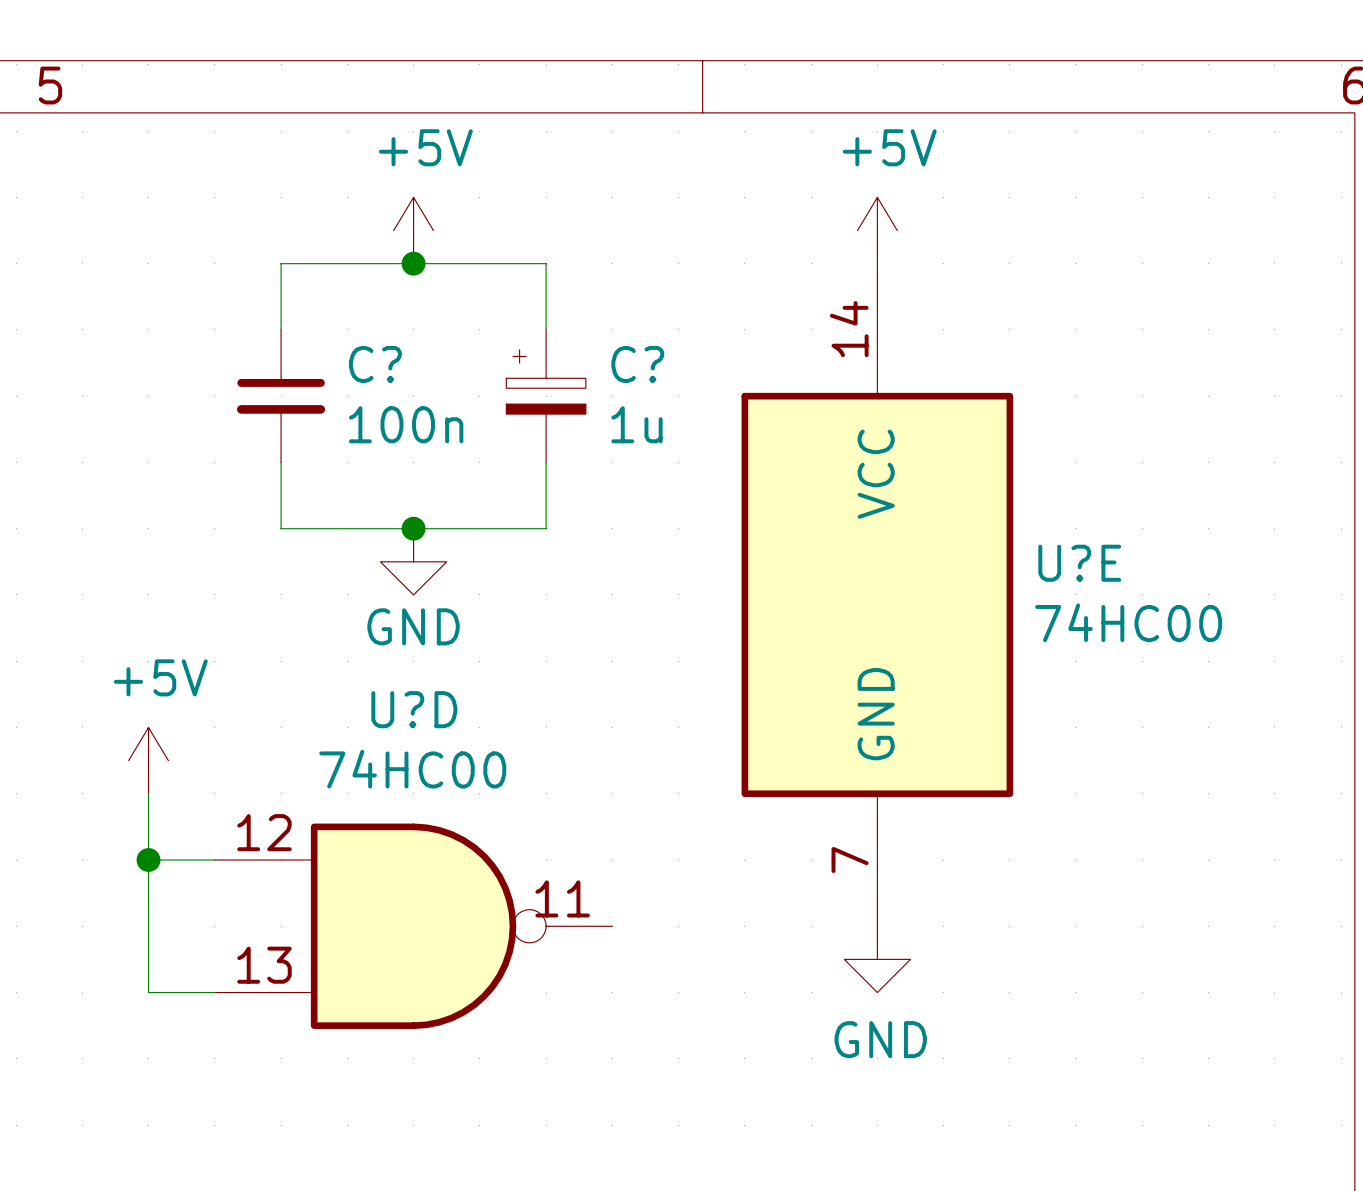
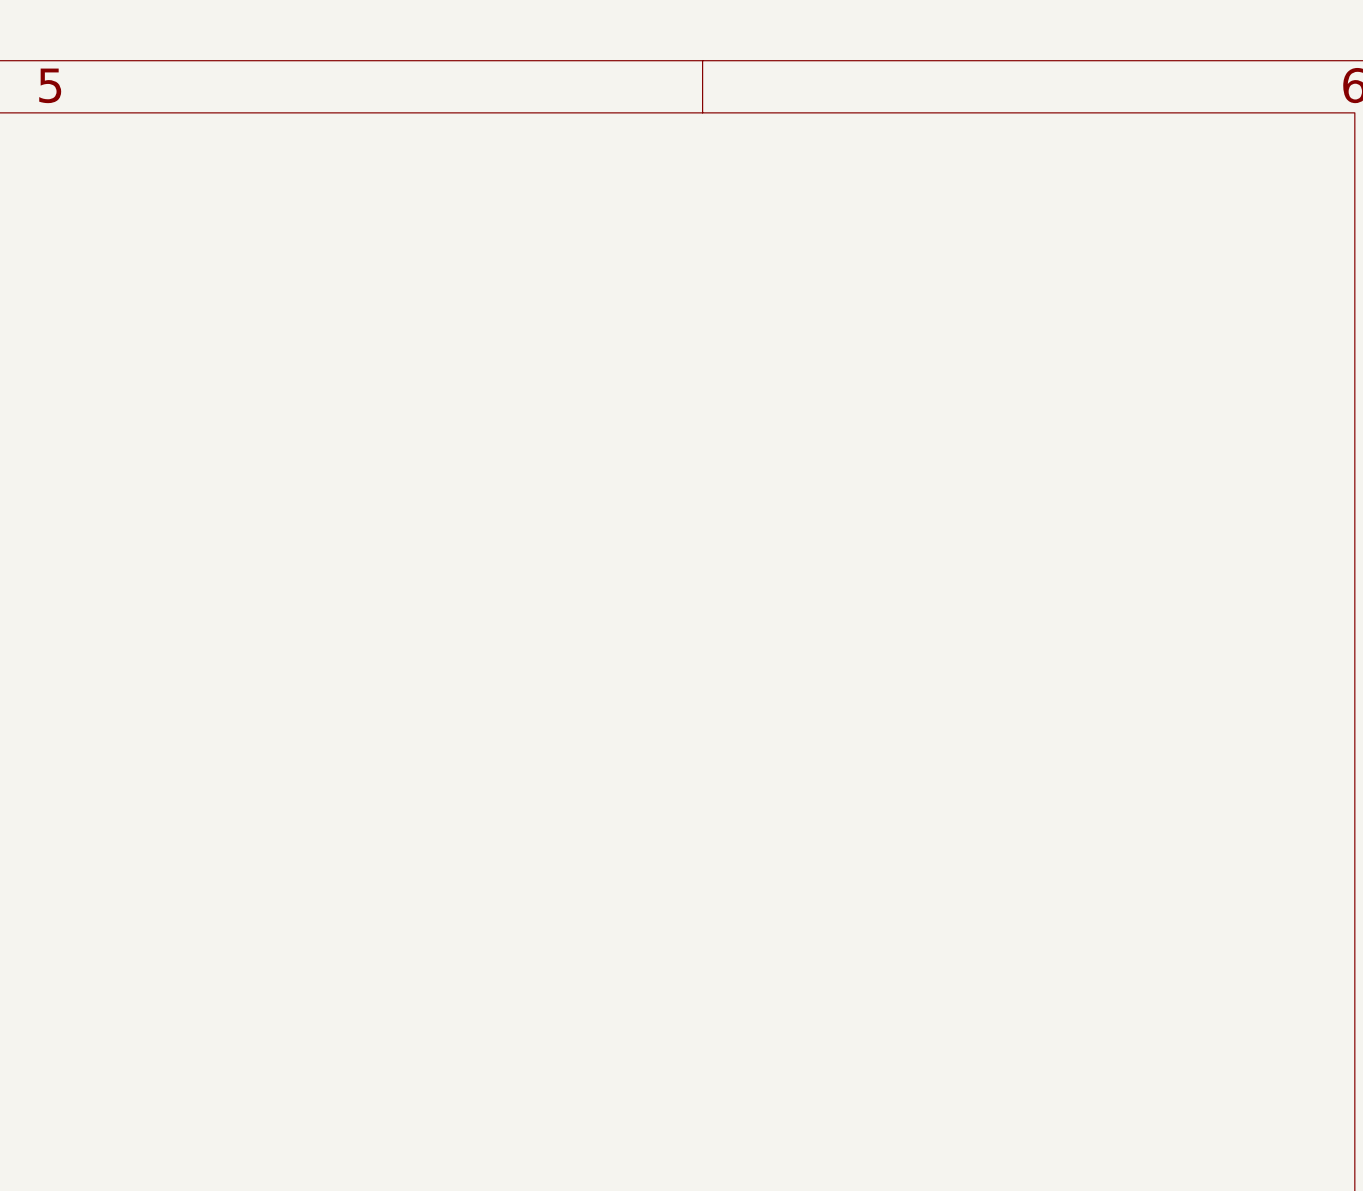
power symbol: +5V (413, 230) -> none
power symbol: +5V (877, 230) -> none
junction: (413, 263) -> none
wire: (281, 329) (281, 263) (546, 263) (546, 329) -> none
C?: 100n (281, 396) -> none
C?: 1u (546, 396) -> none
wire: (281, 462) (281, 528) (546, 528) (546, 462) -> none
junction: (413, 528) -> none
power symbol: GND (413, 561) -> none
U?E: 74HC00 (877, 594) -> none
power symbol: +5V (148, 760) -> none
wire: (148, 793) (148, 992) (214, 992) -> none
wire: (148, 860) (214, 860) -> none
junction: (148, 860) -> none
U?D: 74HC00 (413, 926) -> none
power symbol: GND (877, 959) -> none

